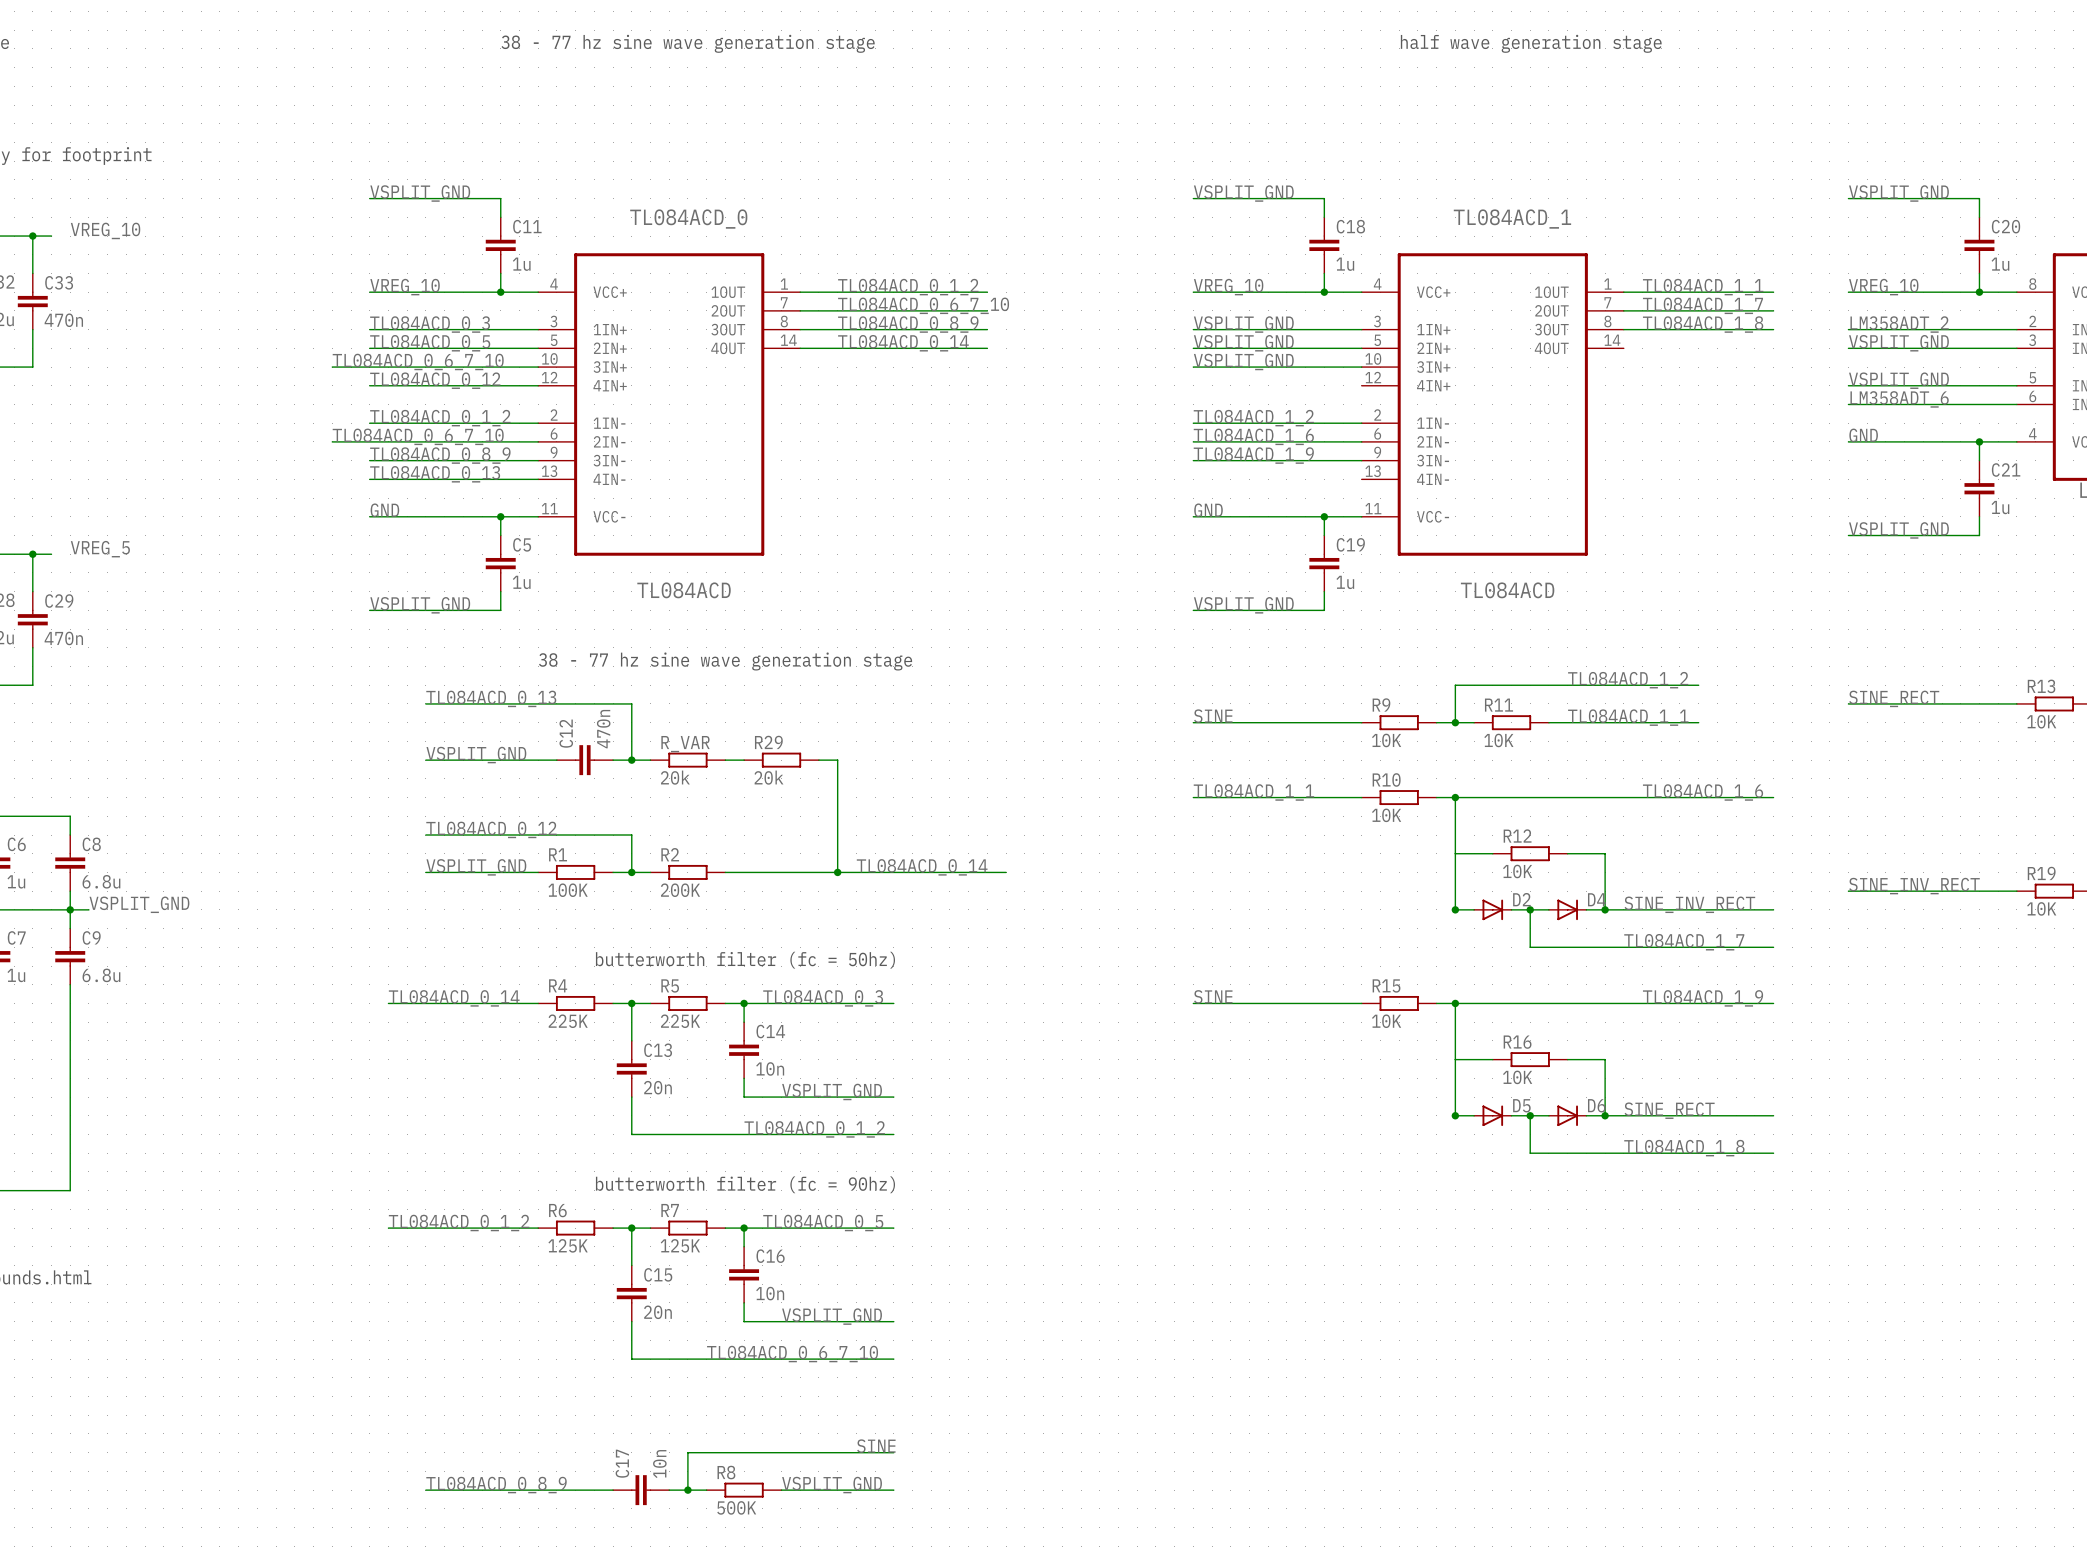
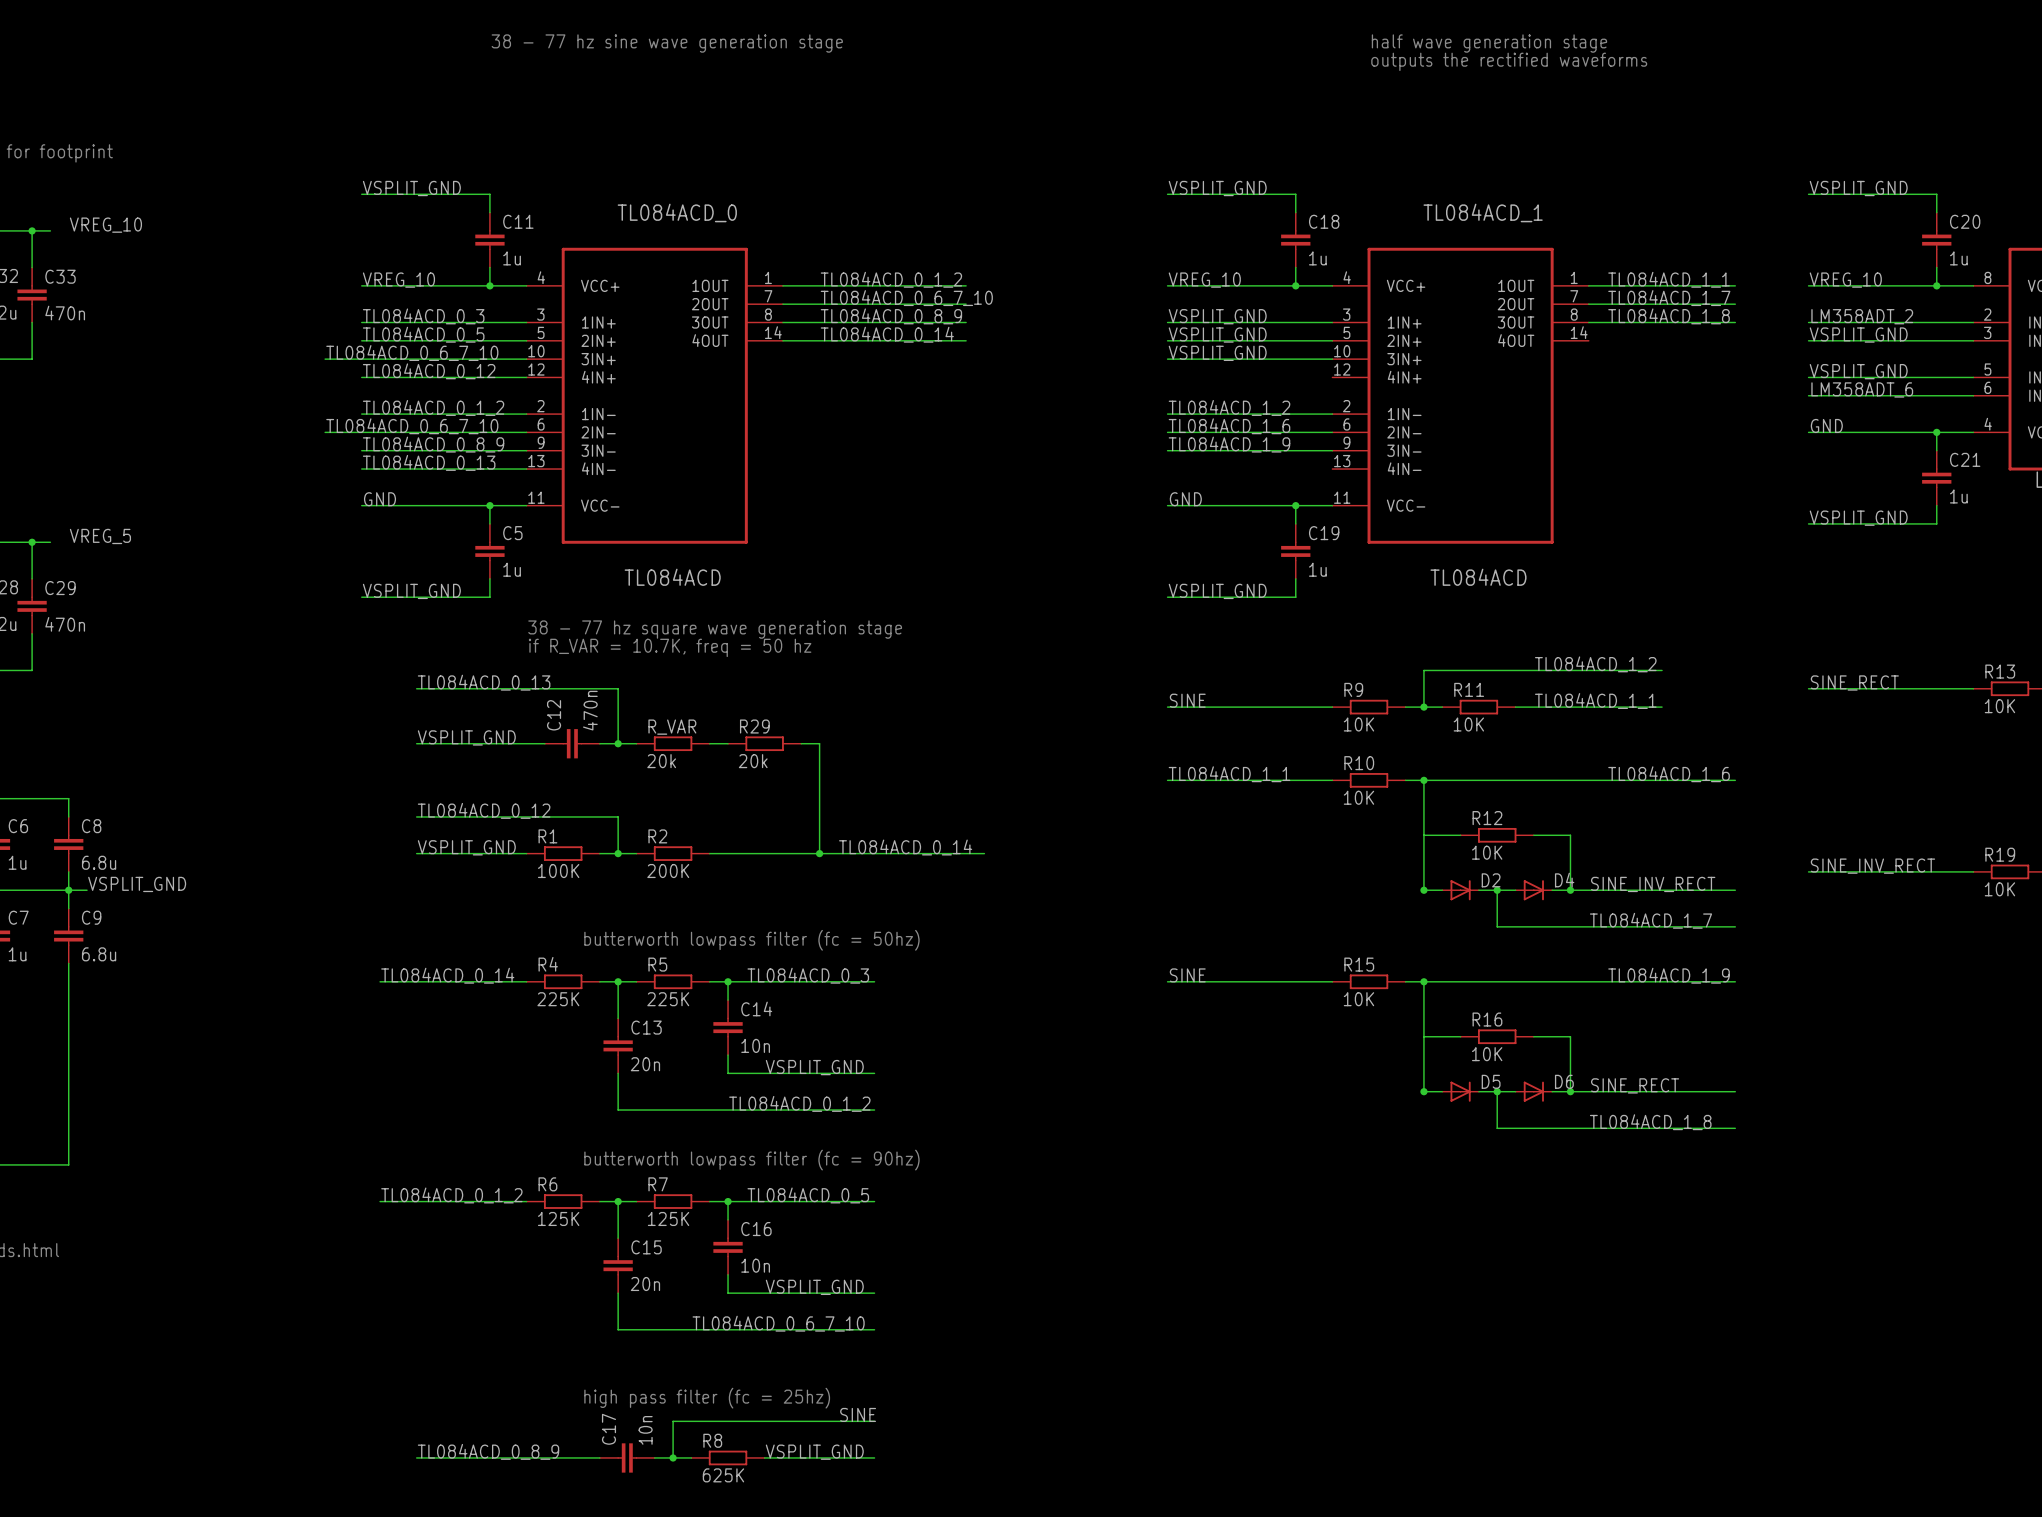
text: none -> outputs the rectified waveforms (1509, 61)
text: none -> 38 - 77 hz square wave generation stage (715, 629)
text: 38 - 77 hz sine wave generation stage (725, 661) -> if R_VAR = 10.7K, freq = 50 hz (670, 647)
text: butterworth filter (fc = 50hz) (745, 960) -> butterworth lowpass filter (fc = 50hz) (751, 940)
text: butterworth filter (fc = 90hz) (745, 1184) -> butterworth lowpass filter (fc = 90hz) (751, 1160)
text: none -> high pass filter (fc = 25hz) (707, 1398)
R8 value: 500K (736, 1507) -> 625K (723, 1475)

